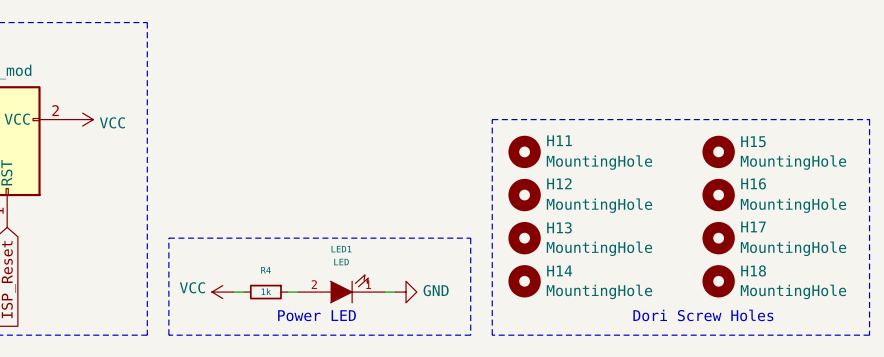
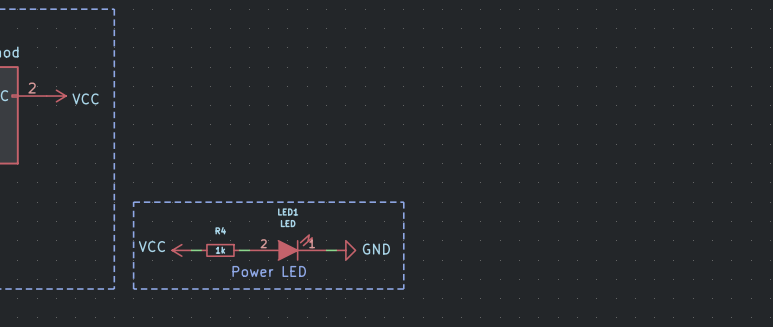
line: (492, 119) (869, 119) (869, 335) (492, 335) (492, 119) -> none
H11: MountingHole (524, 151) -> none
H15: MountingHole (718, 151) -> none
H12: MountingHole (524, 195) -> none
H16: MountingHole (718, 195) -> none
H13: MountingHole (524, 238) -> none
H17: MountingHole (718, 238) -> none
H14: MountingHole (524, 281) -> none
H18: MountingHole (718, 281) -> none
text: Dori Screw Holes (703, 315) -> none

